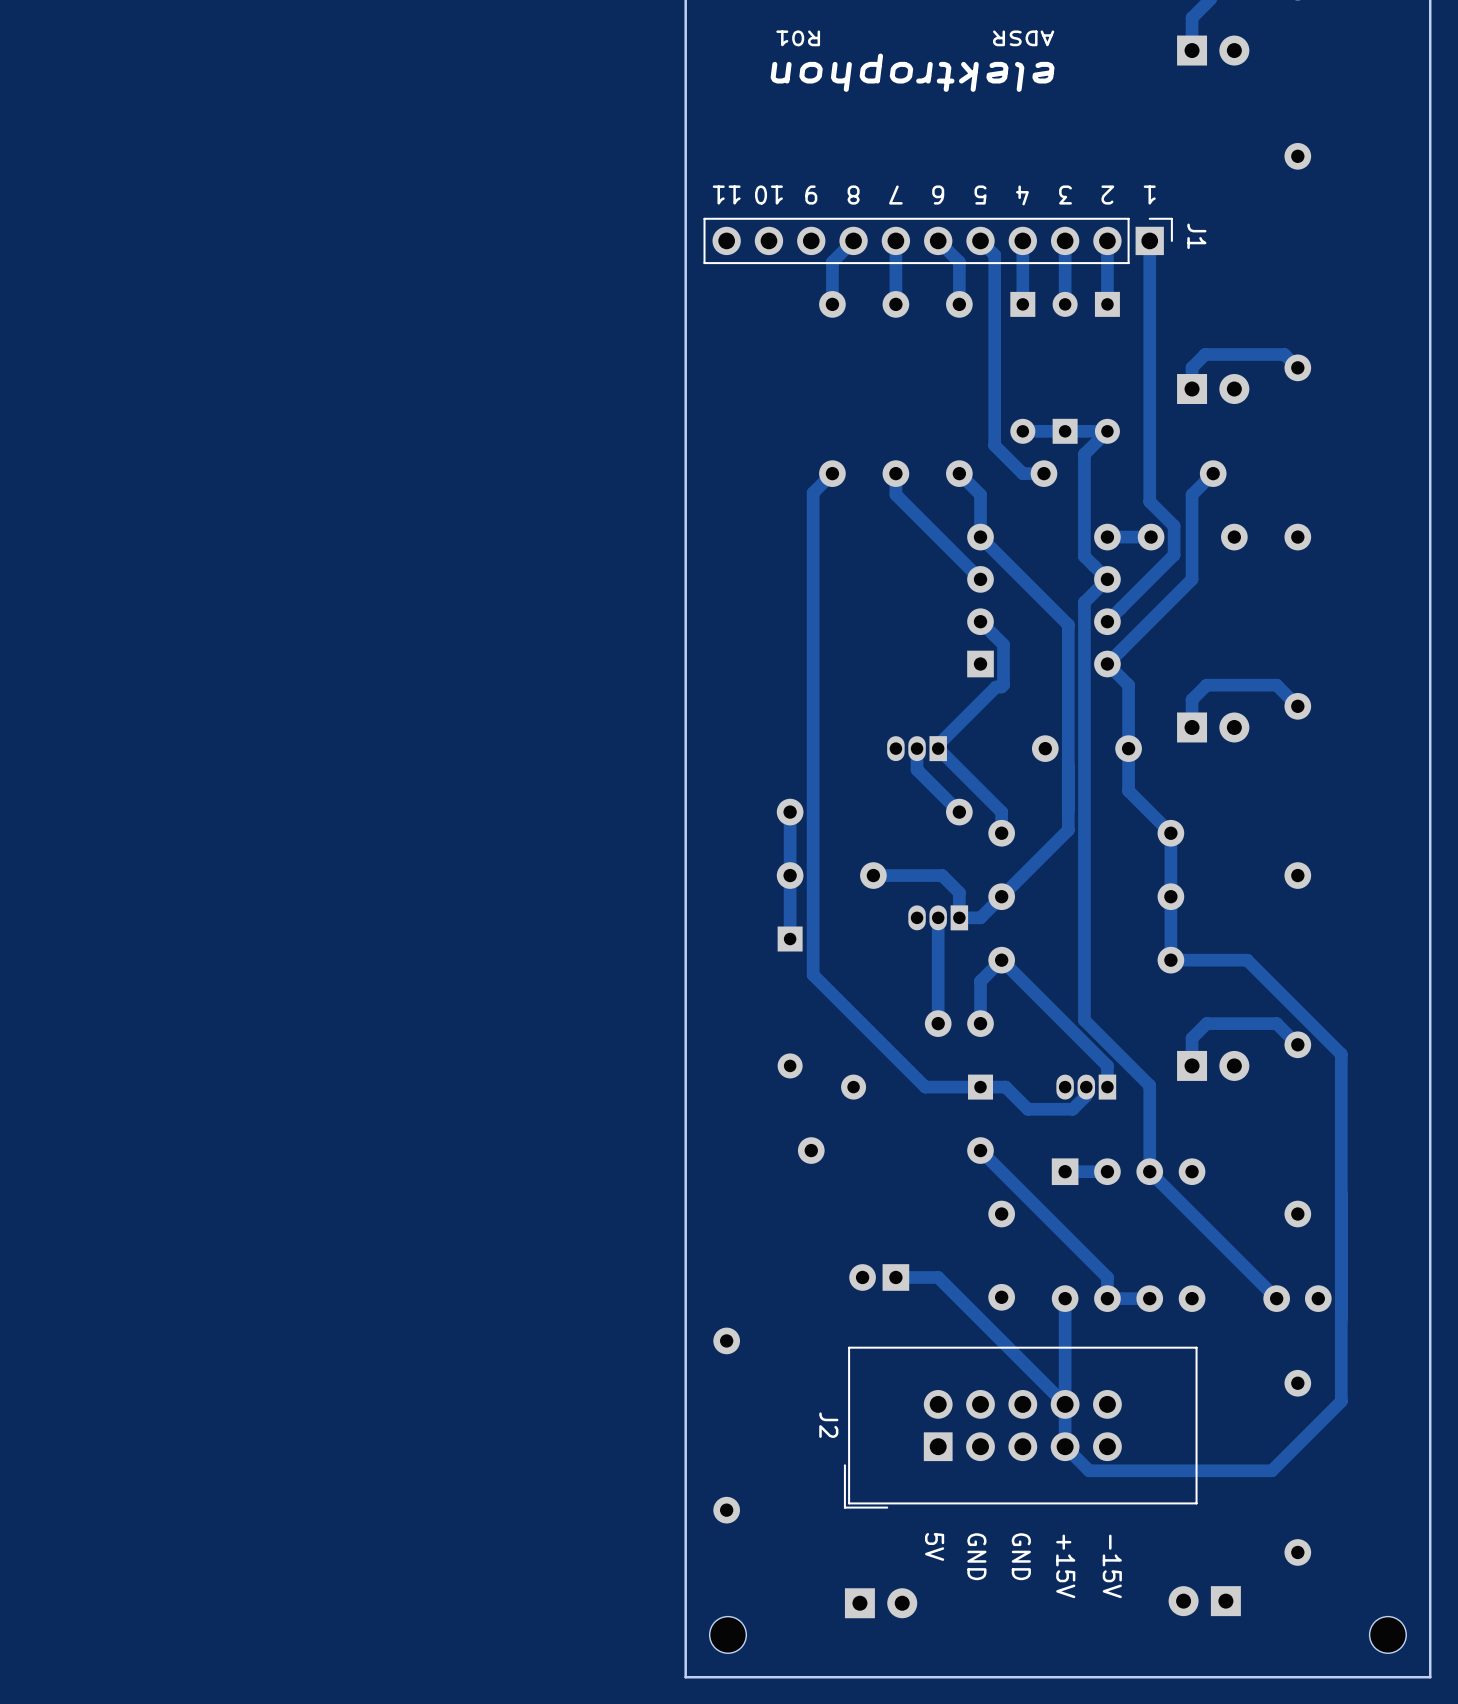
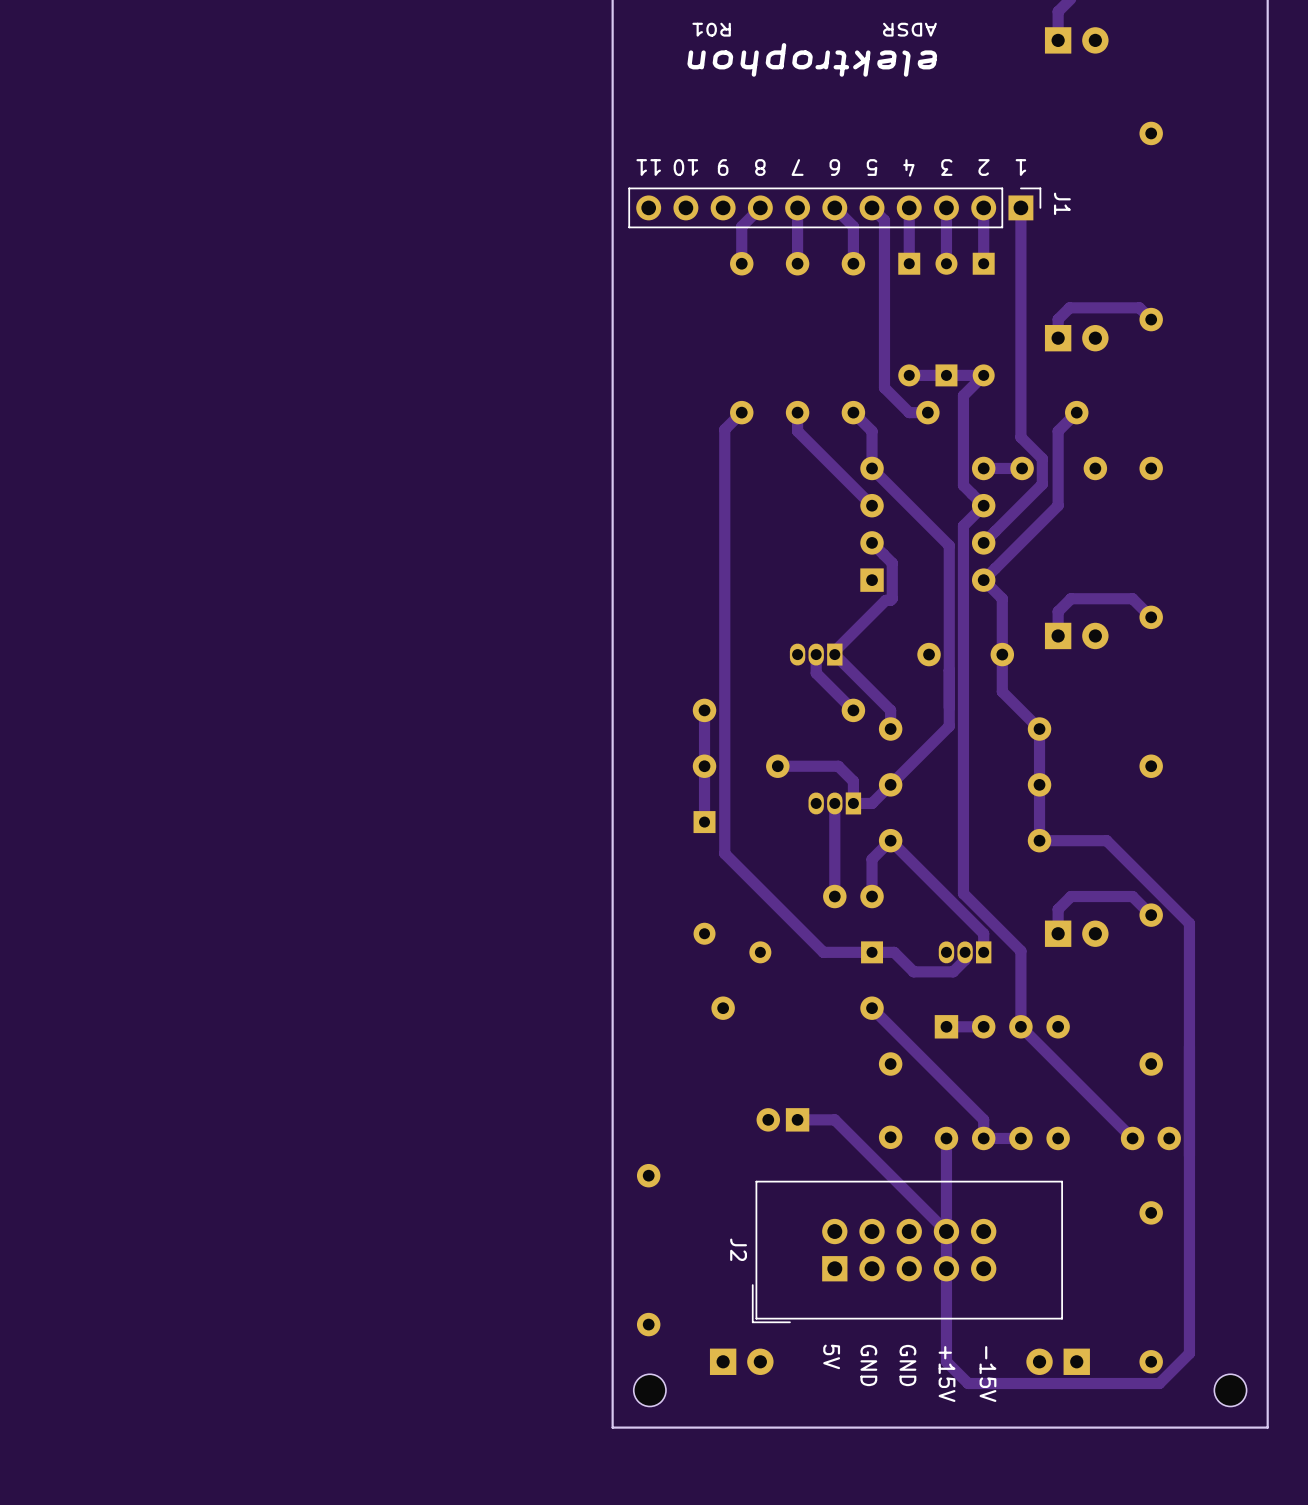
track: (1341, 1401) (1271, 1470) (1089, 1470) (1065, 1446) -> (1189, 1228) (1189, 1353) (1159, 1383) (968, 1383) (946, 1361) (946, 1268)
part position: (1204, 1601) -> (1058, 1361)
part position: (881, 1603) -> (741, 1361)
board edge: (1430, 1627) (1430, 1677) (685, 1677) (685, 1627) -> (1267, 1427) (612, 1427)
part position: (727, 1634) -> (649, 1390)
part position: (1387, 1634) -> (1230, 1390)

